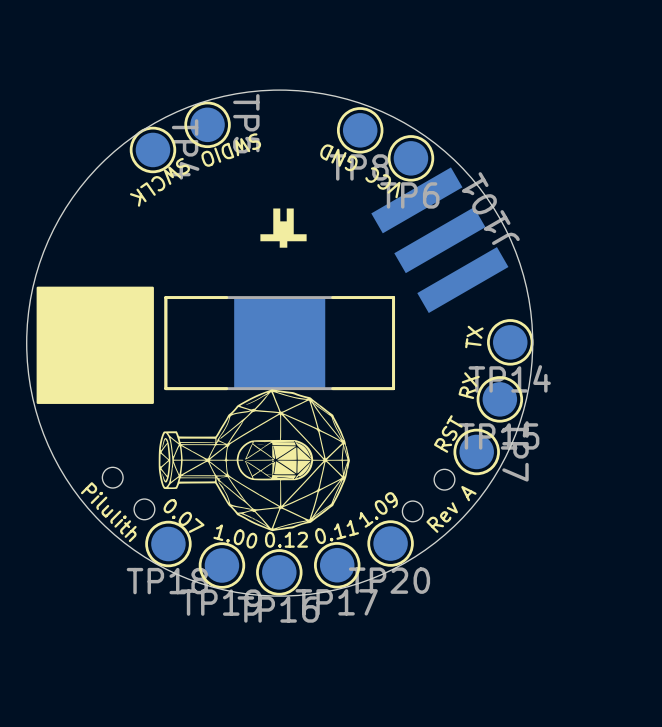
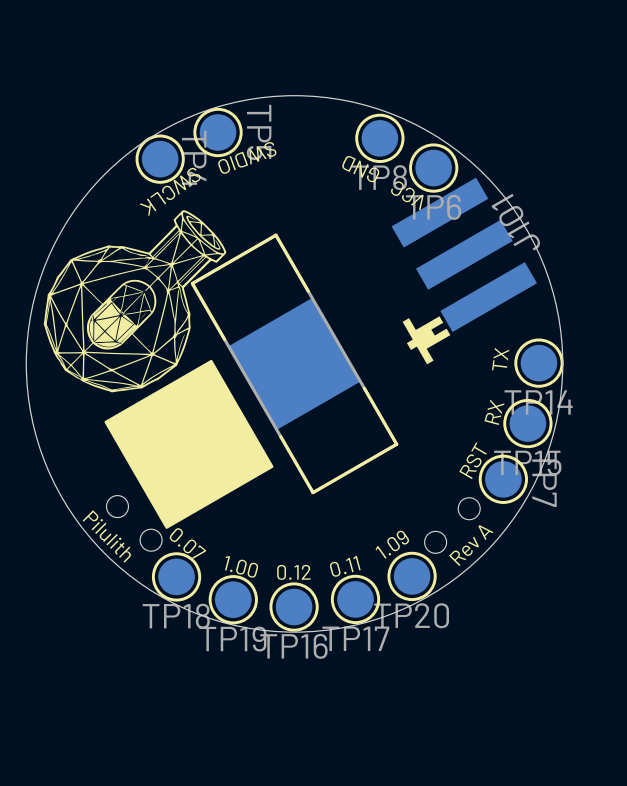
drawing: none -> [43, 210, 274, 529]
drawing: [260, 208, 307, 248] -> none
drawing: [36, 286, 350, 532] -> none
drawing: none -> [402, 316, 451, 365]
part rotation: 0° (279, 343) -> 60° clockwise (294, 363)

